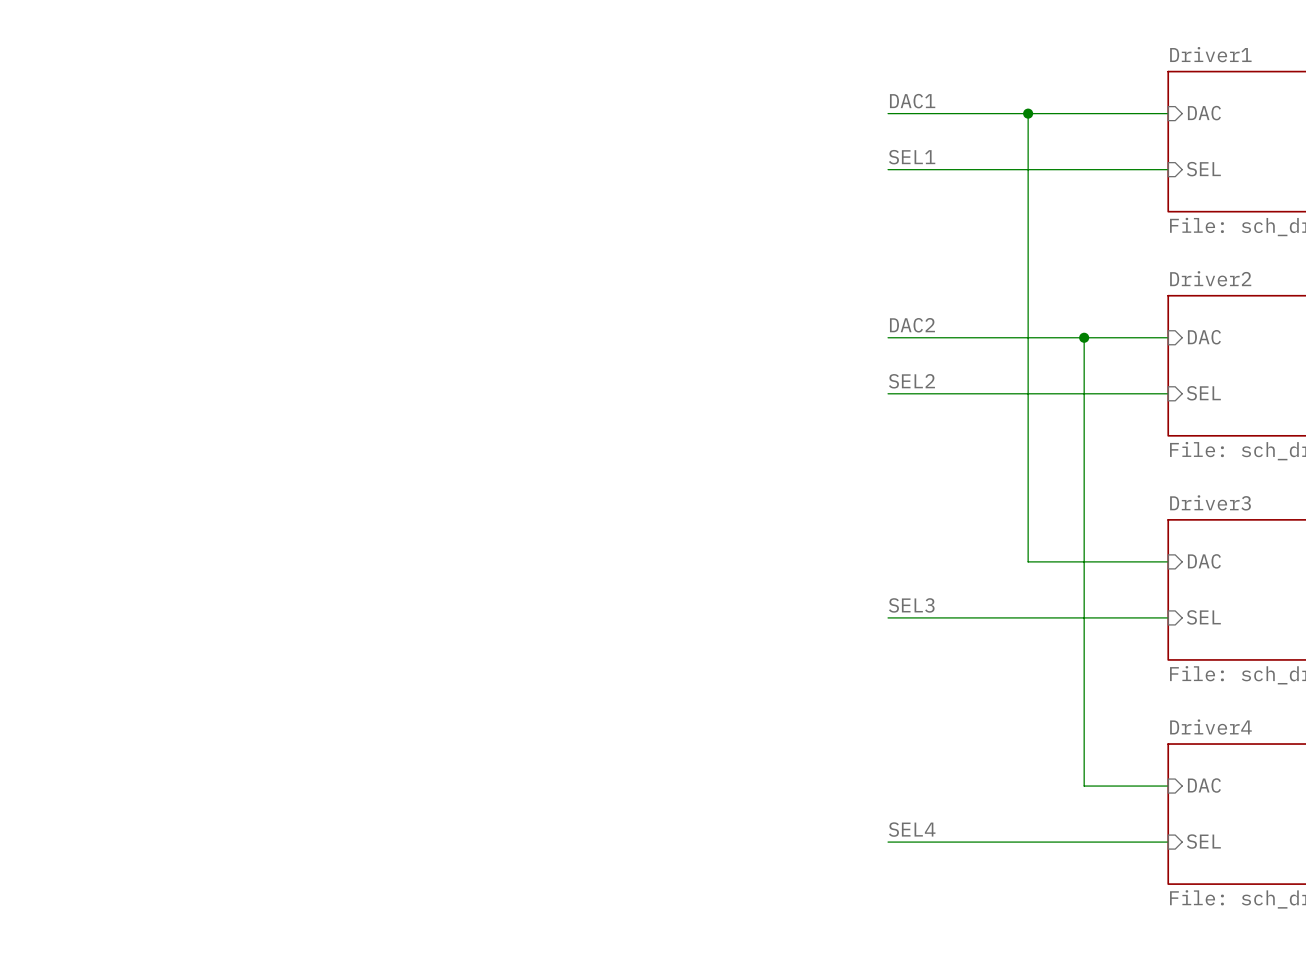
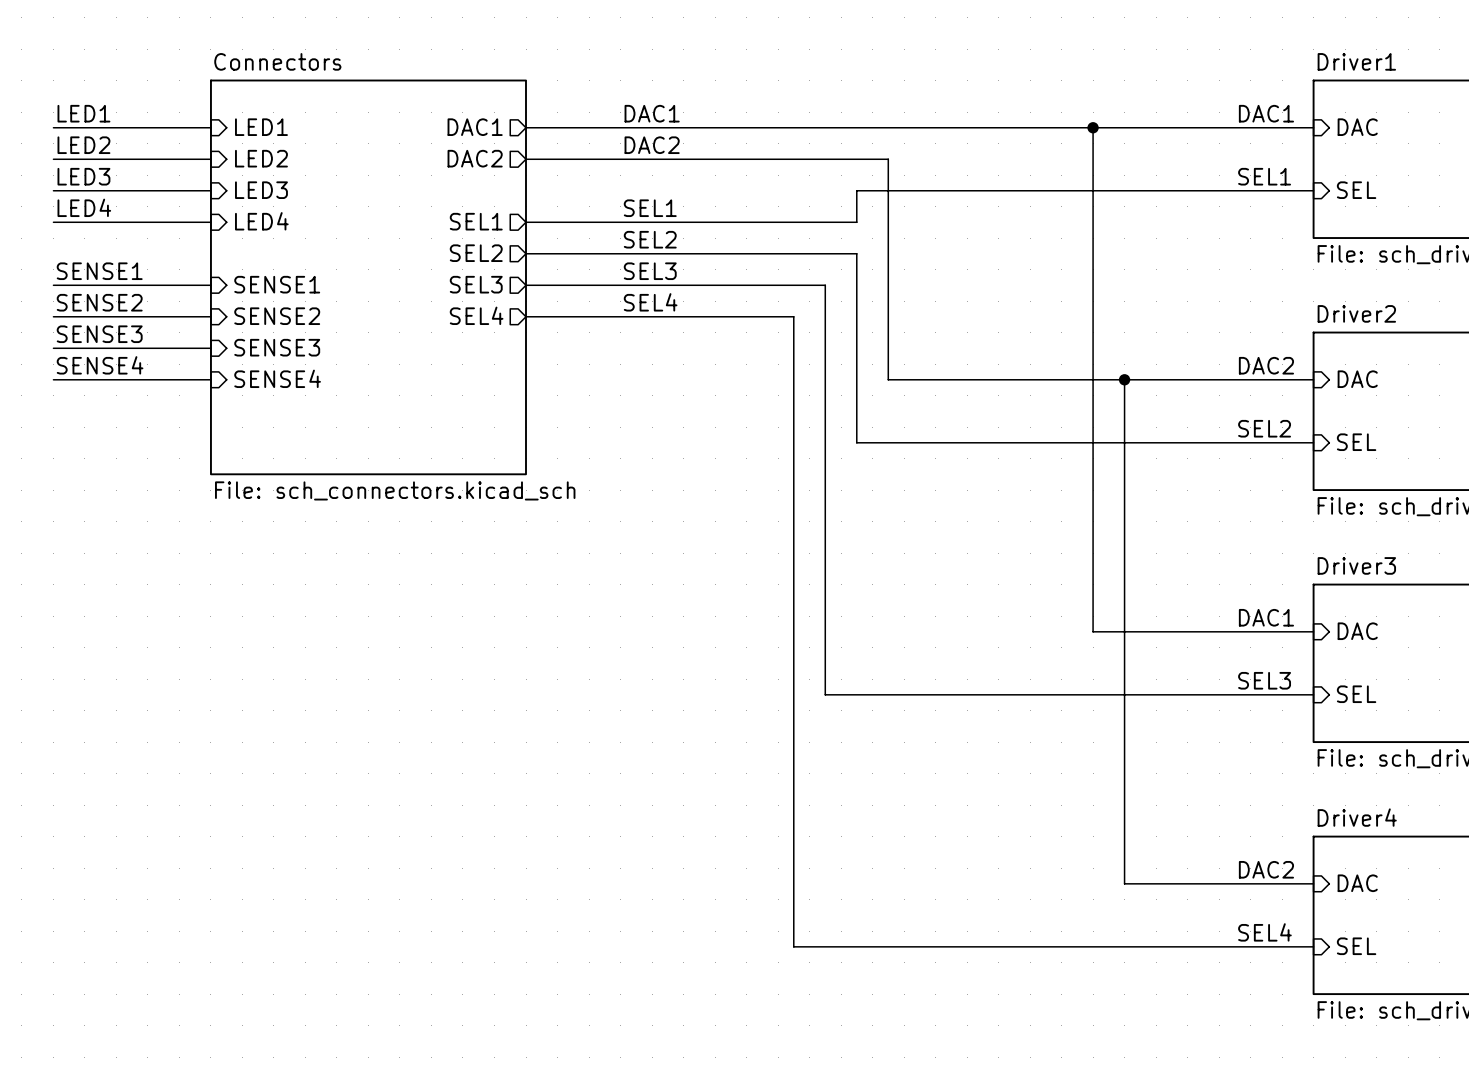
label: none -> LED1 (83, 113)
label: none -> DAC1 (652, 113)
label: DAC1 (912, 101) -> none
label: none -> DAC1 (1266, 113)
wire: none -> (53, 127) (210, 127)
sheet pin: none -> LED1 (261, 127)
sheet pin: none -> DAC1 (475, 127)
wire: none -> (526, 127) (998, 127)
wire: (1028, 113) (1028, 561) -> (1093, 127) (1093, 631) (1156, 631)
junction position: (1028, 113) -> (1093, 127)
label: none -> LED2 (83, 145)
label: none -> DAC2 (652, 145)
sheet pin: none -> LED2 (261, 158)
wire: none -> (53, 159) (210, 159)
sheet pin: none -> DAC2 (475, 158)
wire: none -> (526, 159) (888, 159) (888, 379) (998, 379)
label: none -> LED3 (83, 176)
label: SEL1 (912, 157) -> none
label: none -> SEL1 (1264, 176)
wire: none -> (53, 190) (210, 190)
sheet pin: none -> LED3 (261, 190)
wire: none -> (998, 190) (856, 190) (856, 222) (526, 222)
label: none -> LED4 (84, 207)
label: none -> SEL1 (650, 208)
wire: none -> (53, 222) (210, 222)
sheet pin: none -> LED4 (261, 221)
sheet pin: none -> SEL1 (476, 221)
label: none -> SEL2 (650, 239)
sheet pin: none -> SEL2 (476, 253)
wire: none -> (526, 253) (856, 253) (856, 442) (998, 442)
label: none -> SENSE1 (99, 271)
label: none -> SEL3 (650, 271)
sheet Connectors: none -> File: sch_connectors.kicad_sch (368, 277)
wire: none -> (53, 285) (210, 285)
sheet pin: none -> SENSE1 (277, 284)
sheet pin: none -> SEL3 (476, 284)
wire: none -> (526, 285) (825, 285) (825, 694) (998, 694)
label: none -> SENSE2 (99, 302)
label: none -> SEL4 (650, 302)
wire: none -> (53, 316) (210, 316)
sheet pin: none -> SENSE2 (277, 316)
sheet pin: none -> SEL4 (476, 315)
wire: none -> (526, 316) (793, 316) (793, 946) (998, 946)
label: none -> SENSE3 (99, 334)
wire: none -> (53, 348) (210, 348)
sheet pin: none -> SENSE3 (277, 347)
label: none -> SENSE4 (100, 365)
label: DAC2 (912, 325) -> none
label: none -> DAC2 (1266, 365)
wire: none -> (53, 379) (210, 379)
sheet pin: none -> SENSE4 (277, 378)
junction: none -> (1124, 379)
wire: (1084, 337) (1084, 786) -> (1124, 379) (1124, 883) (1219, 883)
junction: (1084, 337) -> none
label: SEL2 (911, 381) -> none
label: none -> SEL2 (1264, 428)
label: none -> DAC1 (1266, 617)
label position: SEL3 (911, 605) -> SEL3 (1264, 680)
label: none -> DAC2 (1266, 869)
label position: SEL4 (912, 829) -> SEL4 (1264, 932)

